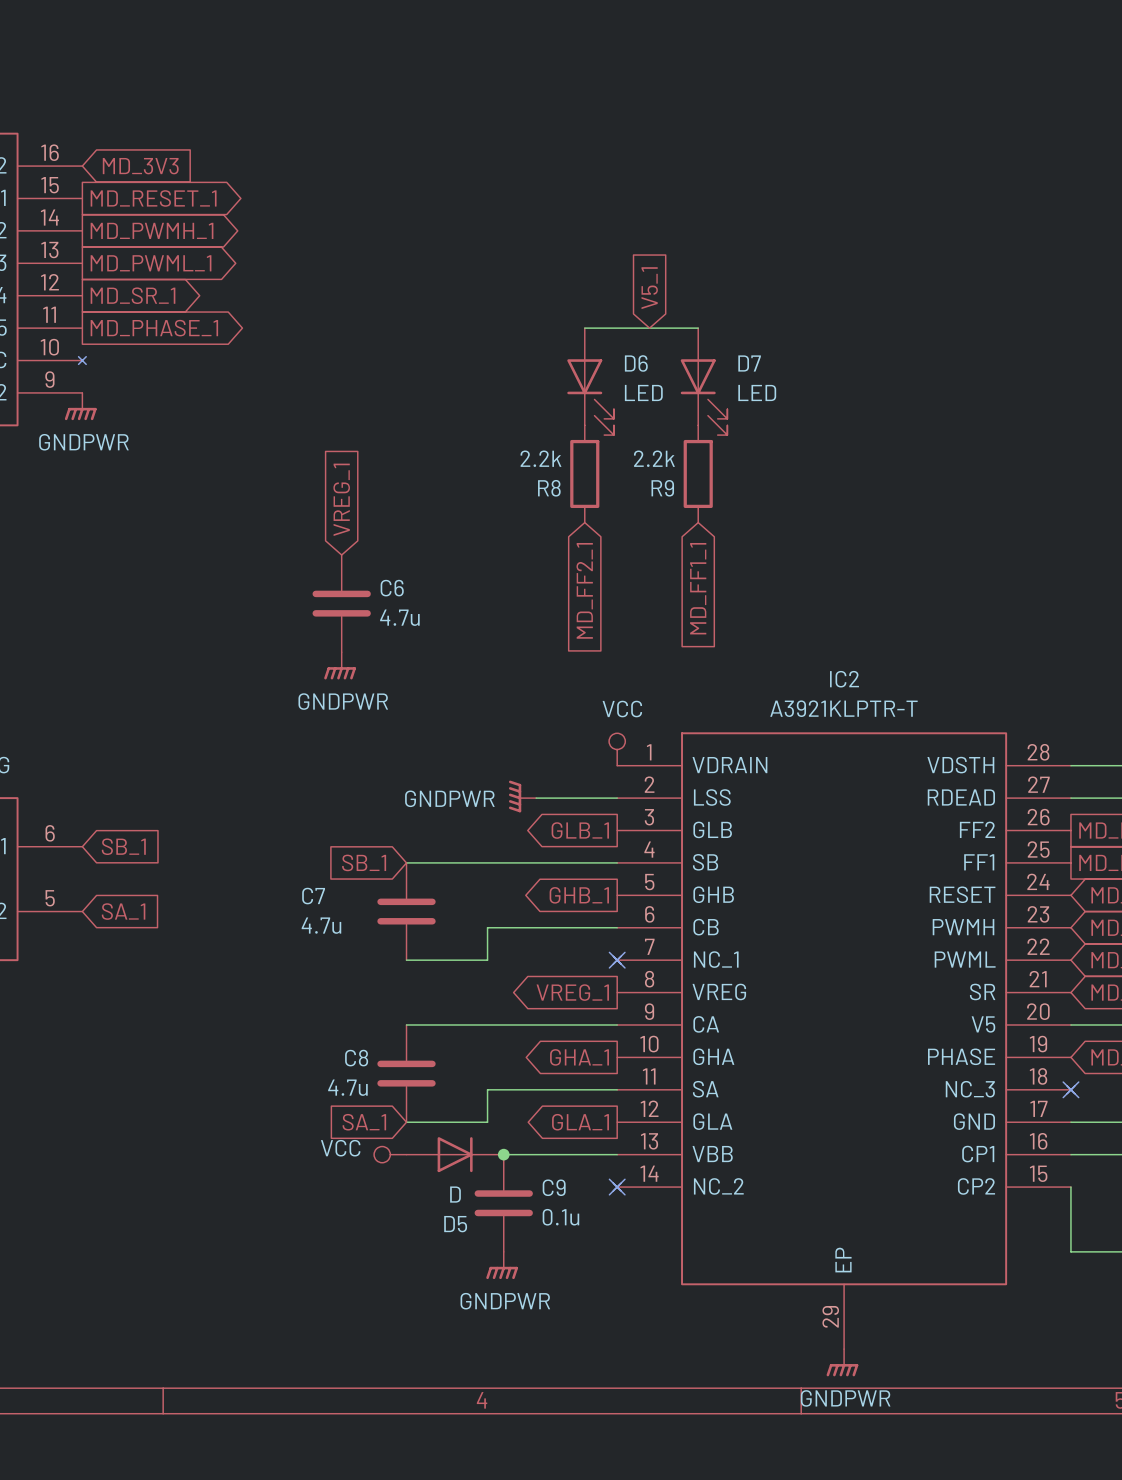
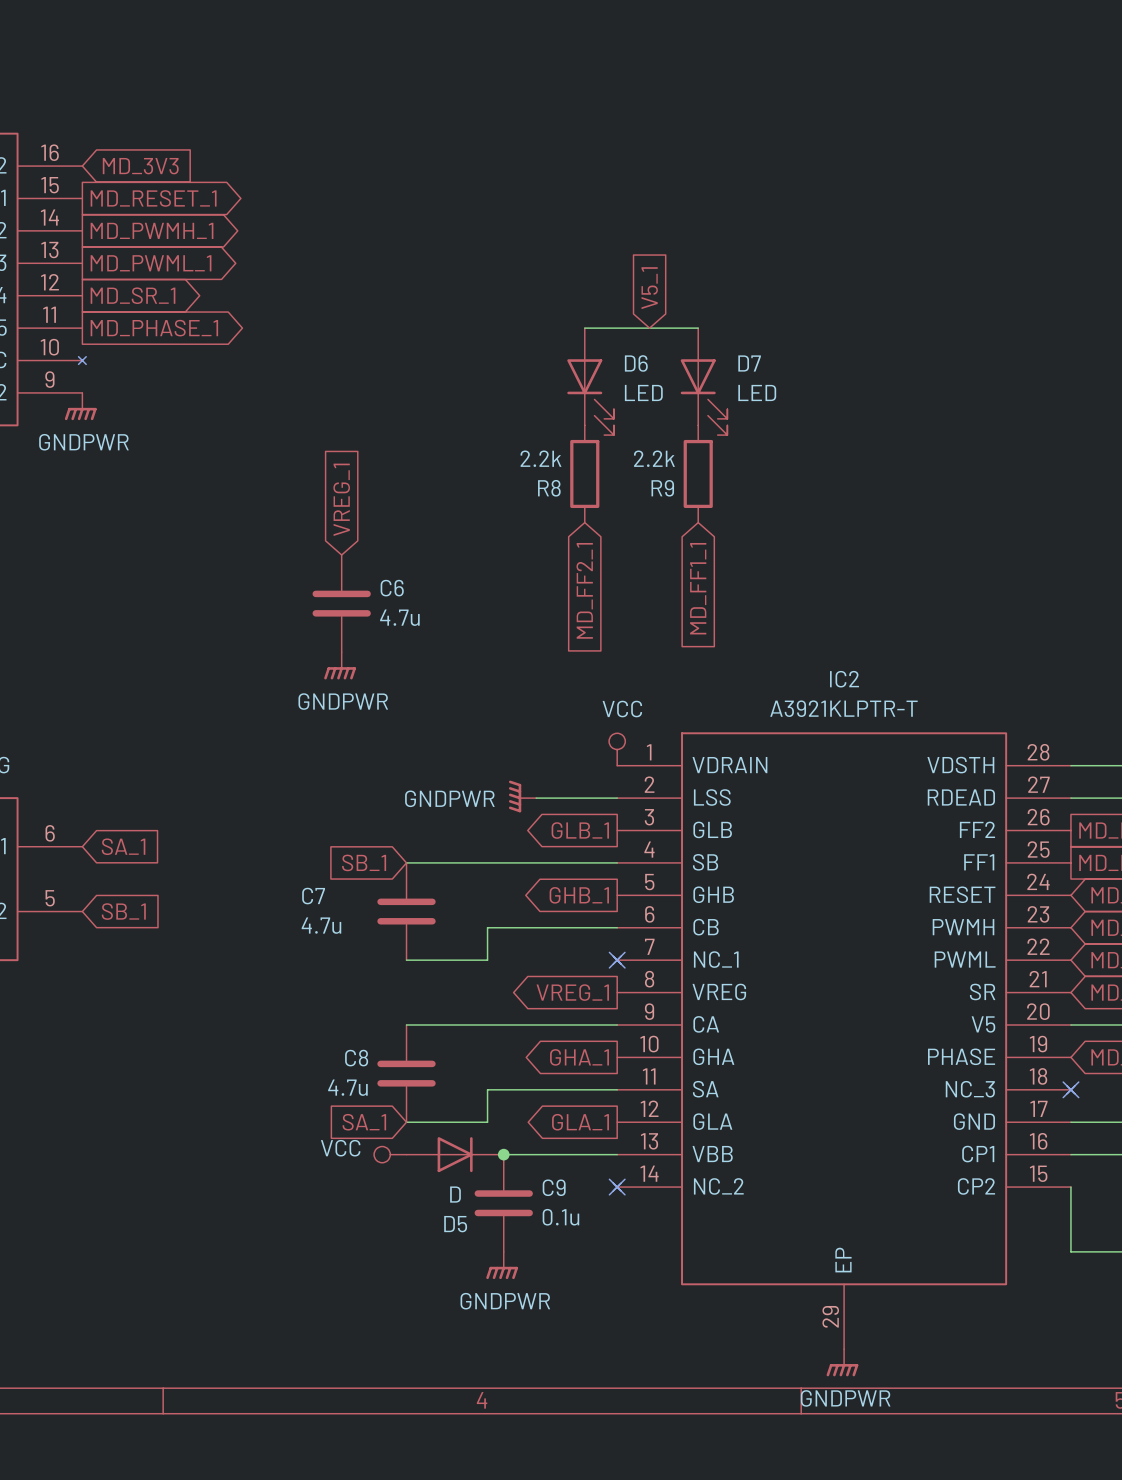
global label: SB_1 (123, 846) -> SA_1 (123, 846)
global label: SA_1 (123, 911) -> SB_1 (123, 911)

